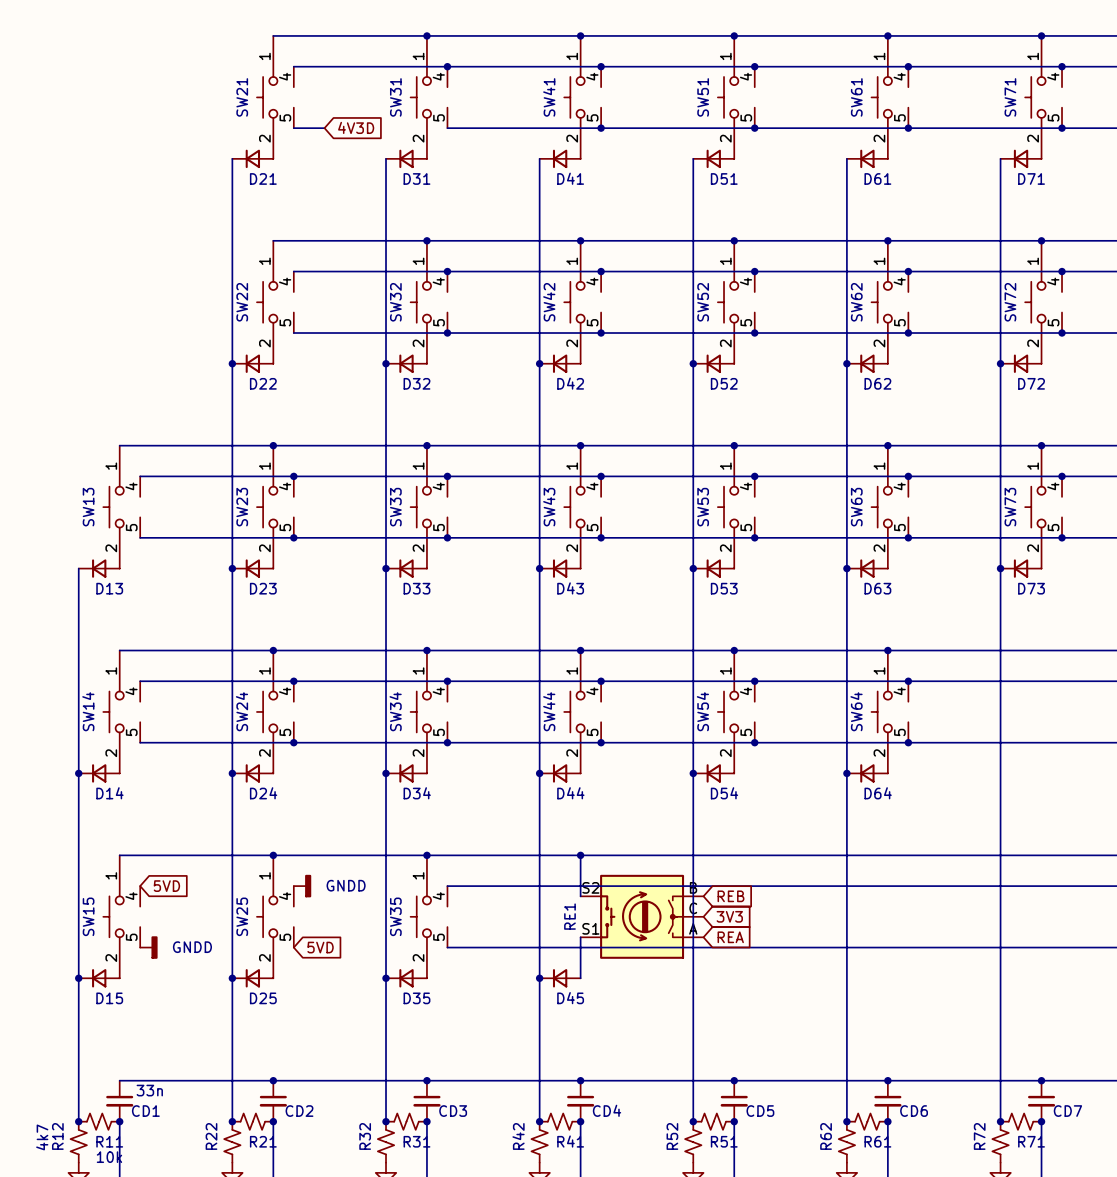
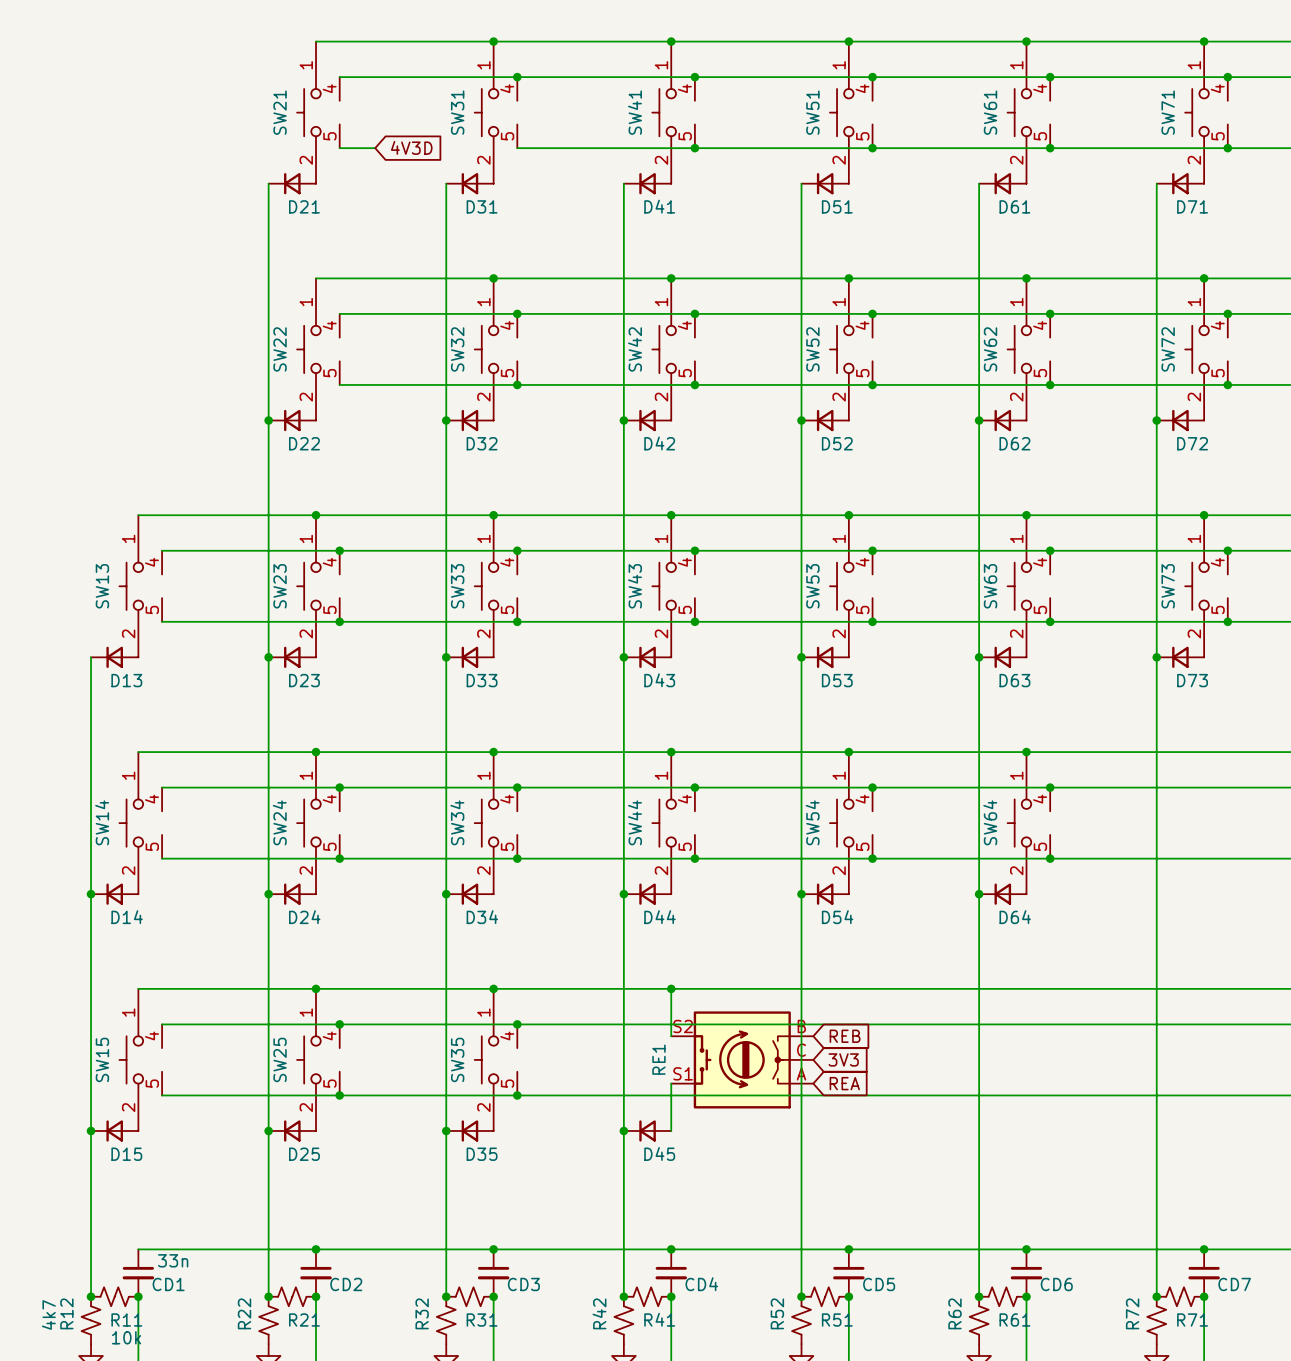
wire: none -> (162, 1024) (517, 1024)
global label: 5VD (166, 886) -> none
junction: none -> (339, 1024)
power symbol: GNDD (302, 886) -> none
junction: none -> (517, 1024)
wire: none -> (162, 1095) (517, 1095)
power symbol: GNDD (148, 947) -> none
junction: none -> (339, 1095)
global label: 5VD (320, 947) -> none
junction: none -> (517, 1095)

